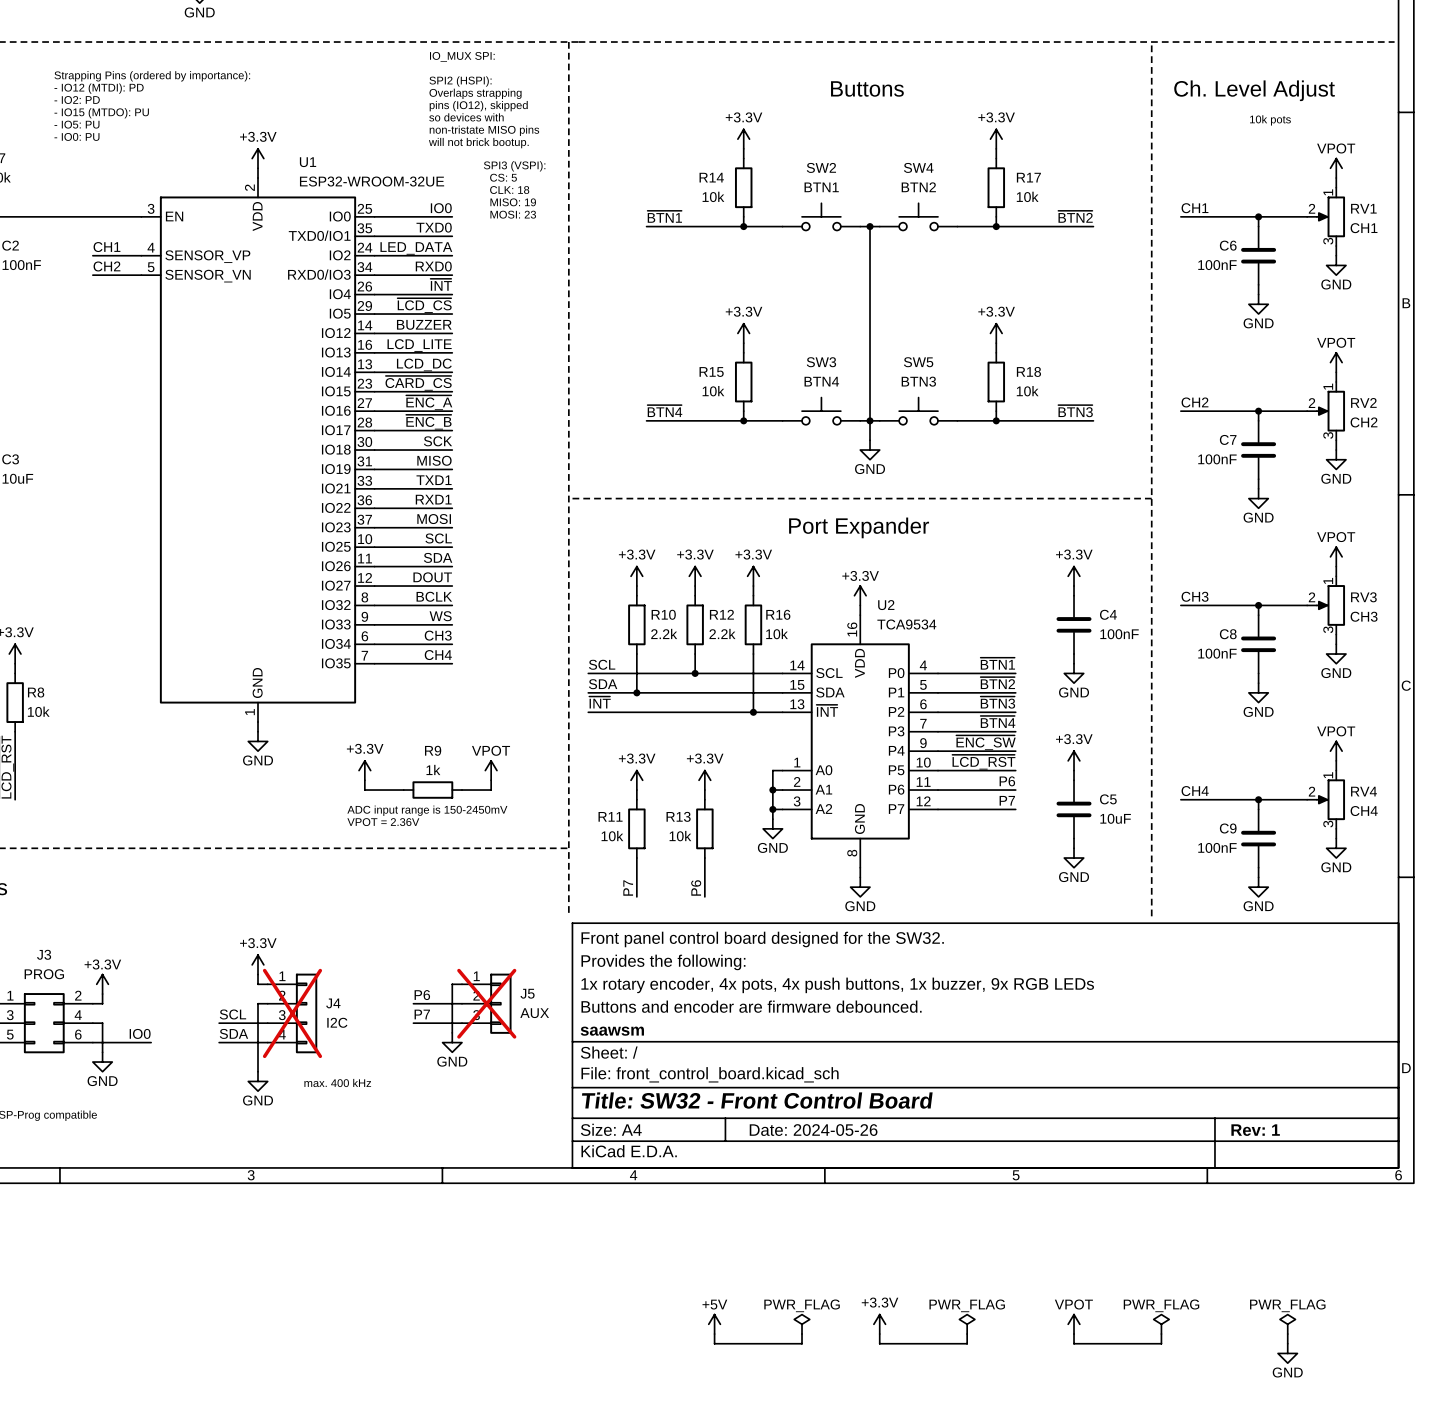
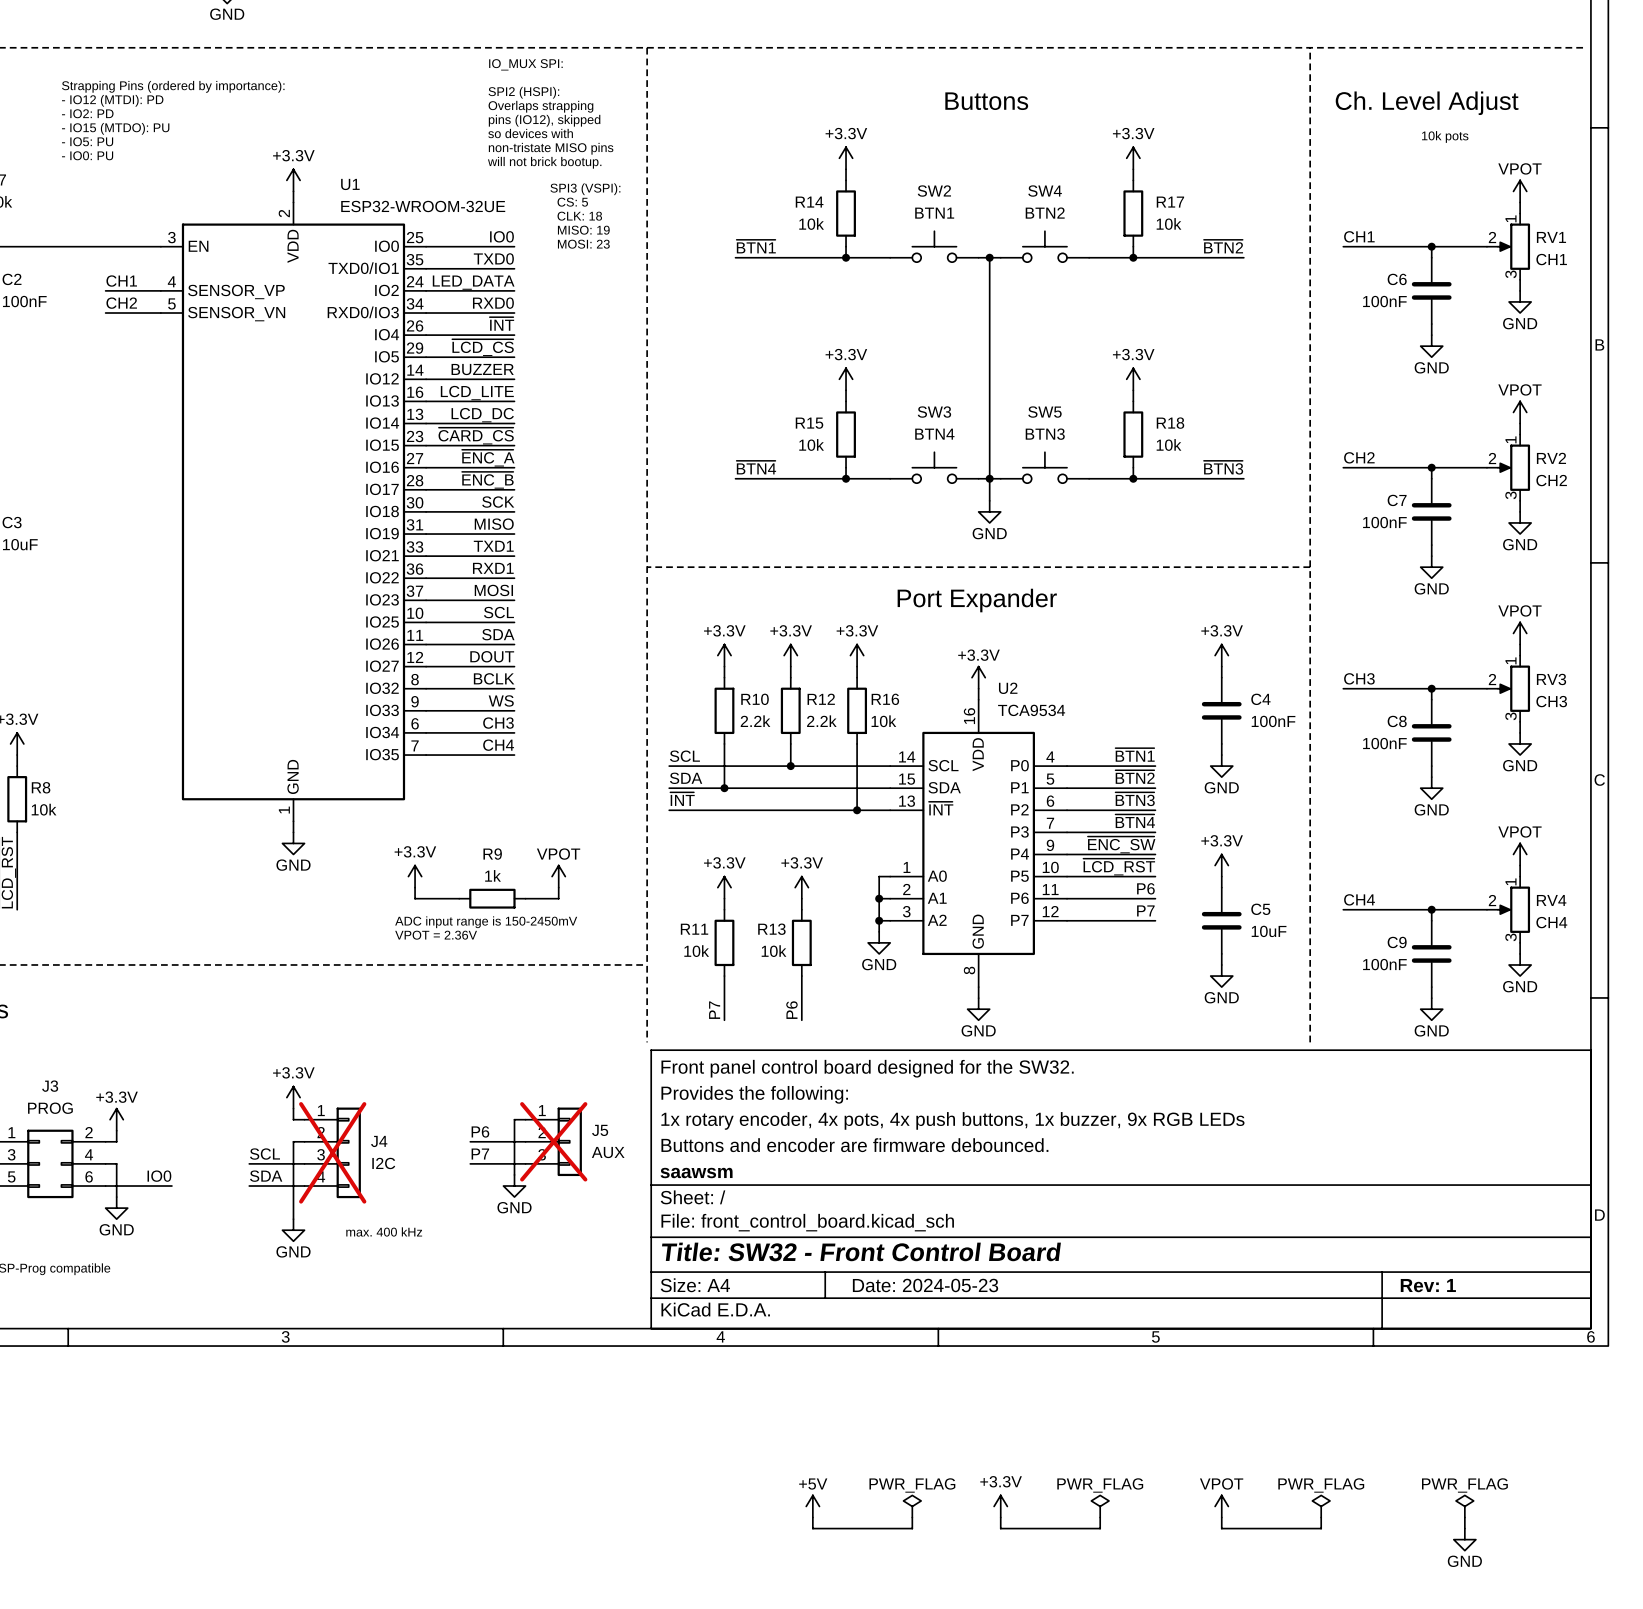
title block: Date: 2024-05-26 (813, 1130) -> Date: 2024-05-23 (925, 1285)

